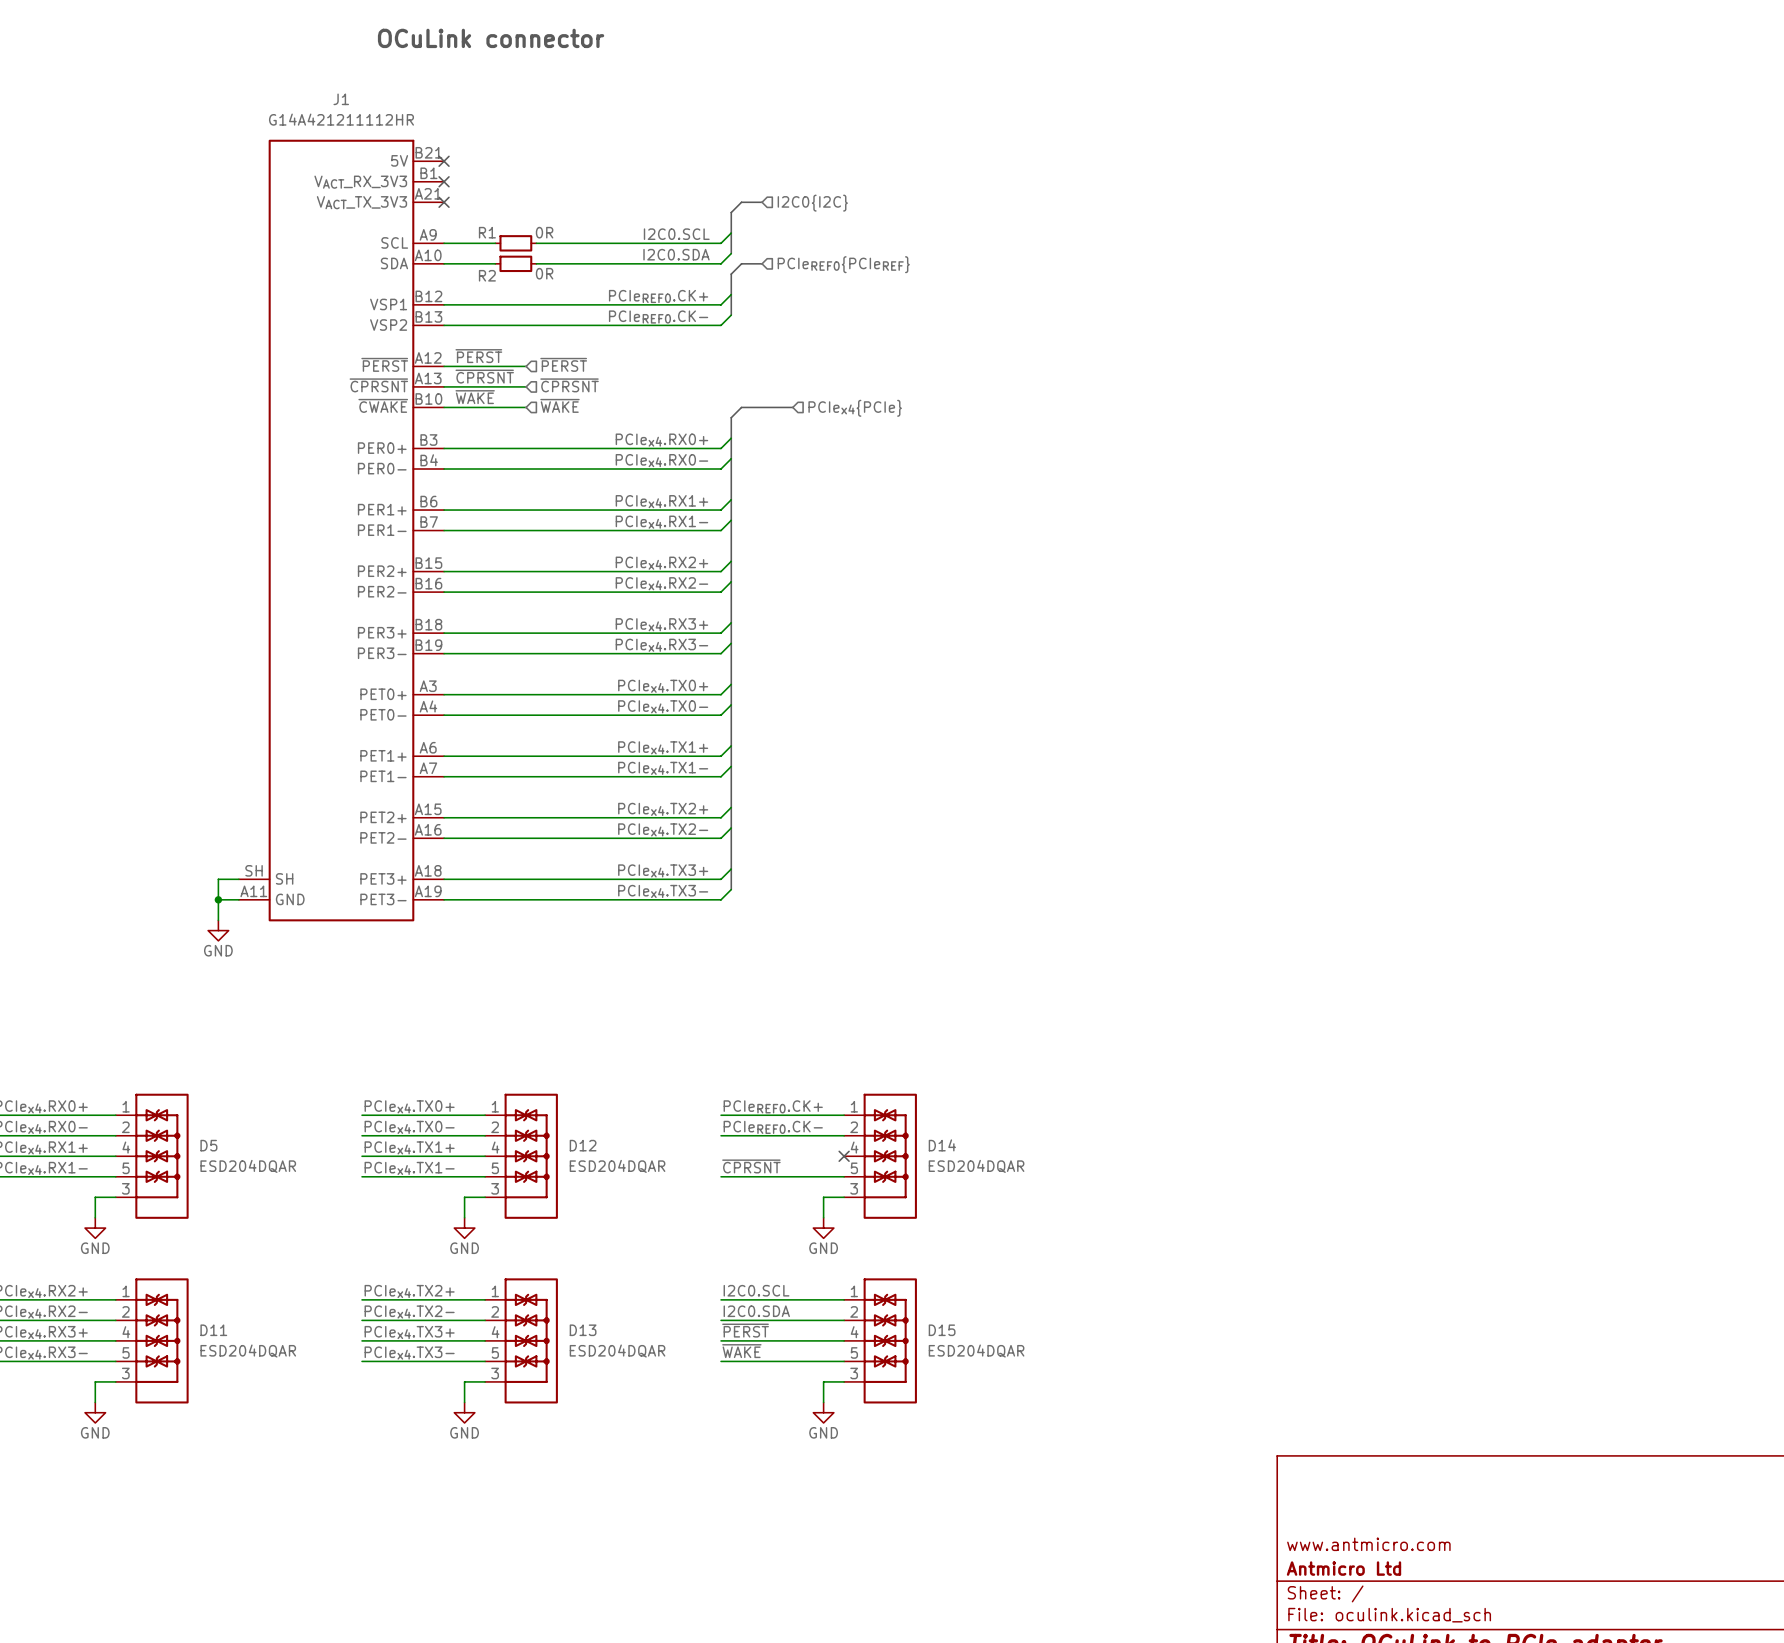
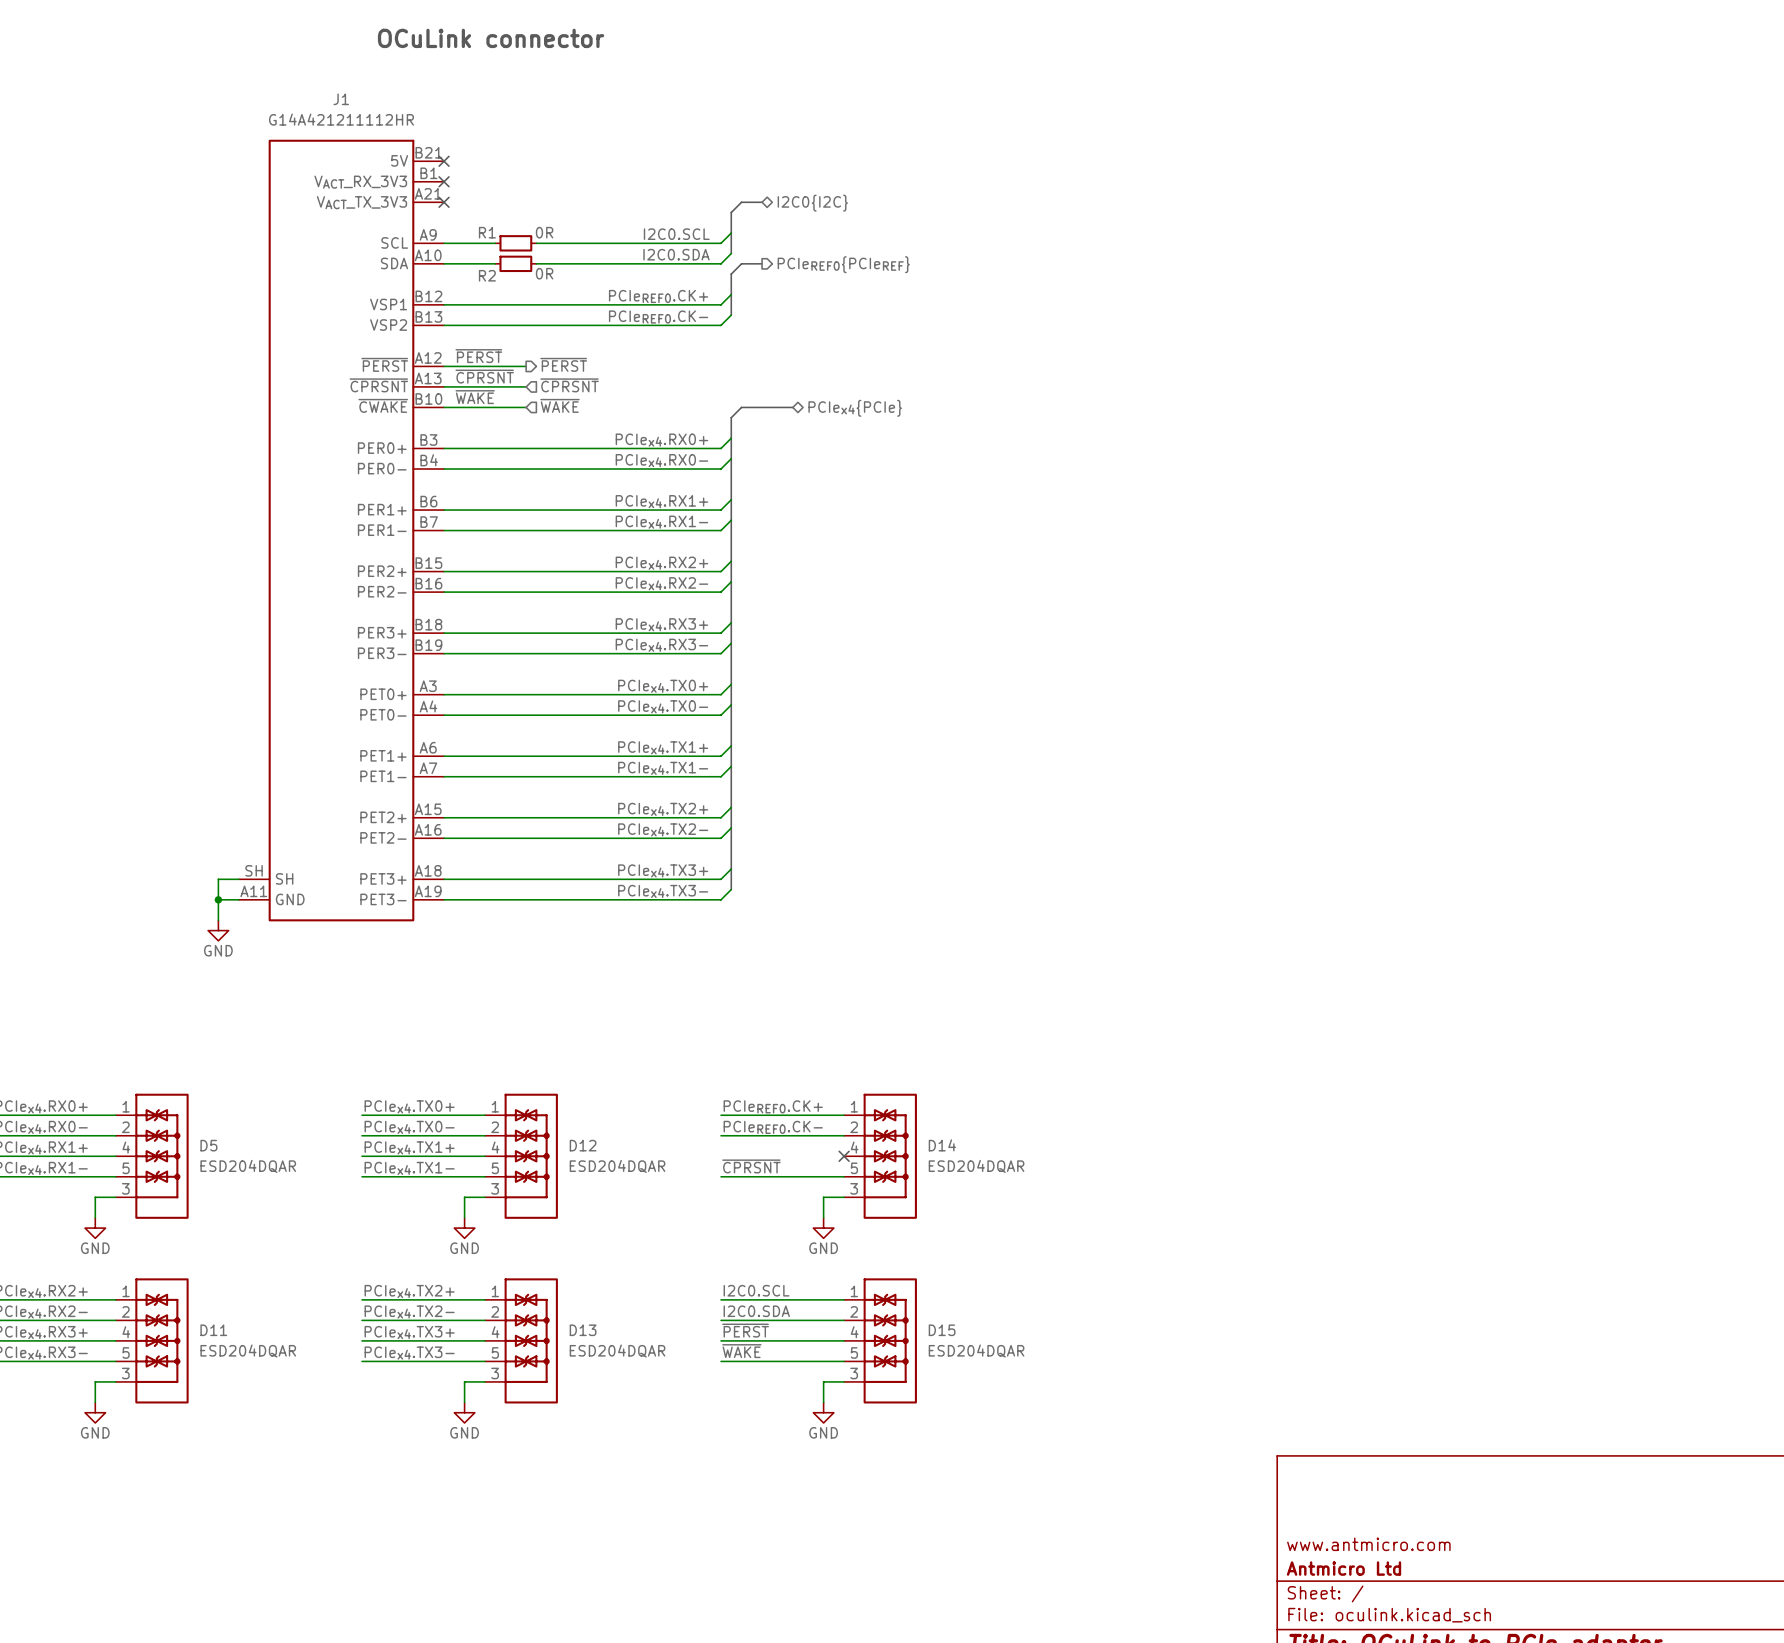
hierarchical label shape: input (812, 203) -> bidirectional (812, 203)
hierarchical label shape: input (843, 264) -> output (843, 264)
hierarchical label shape: input (563, 364) -> output (563, 364)
hierarchical label shape: input (855, 408) -> bidirectional (855, 408)

